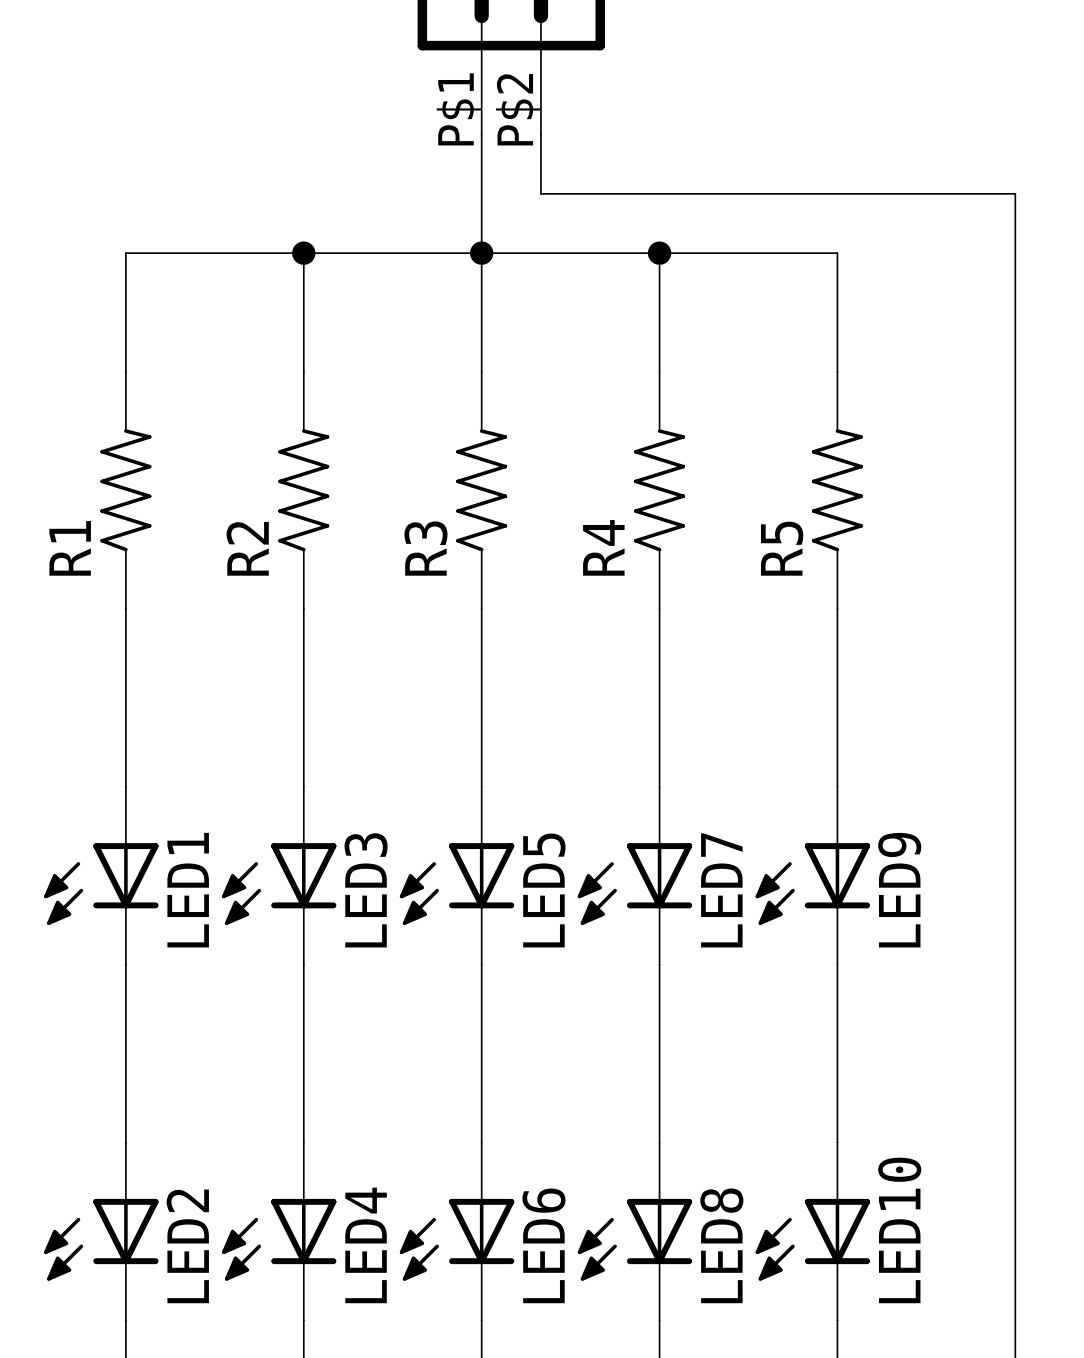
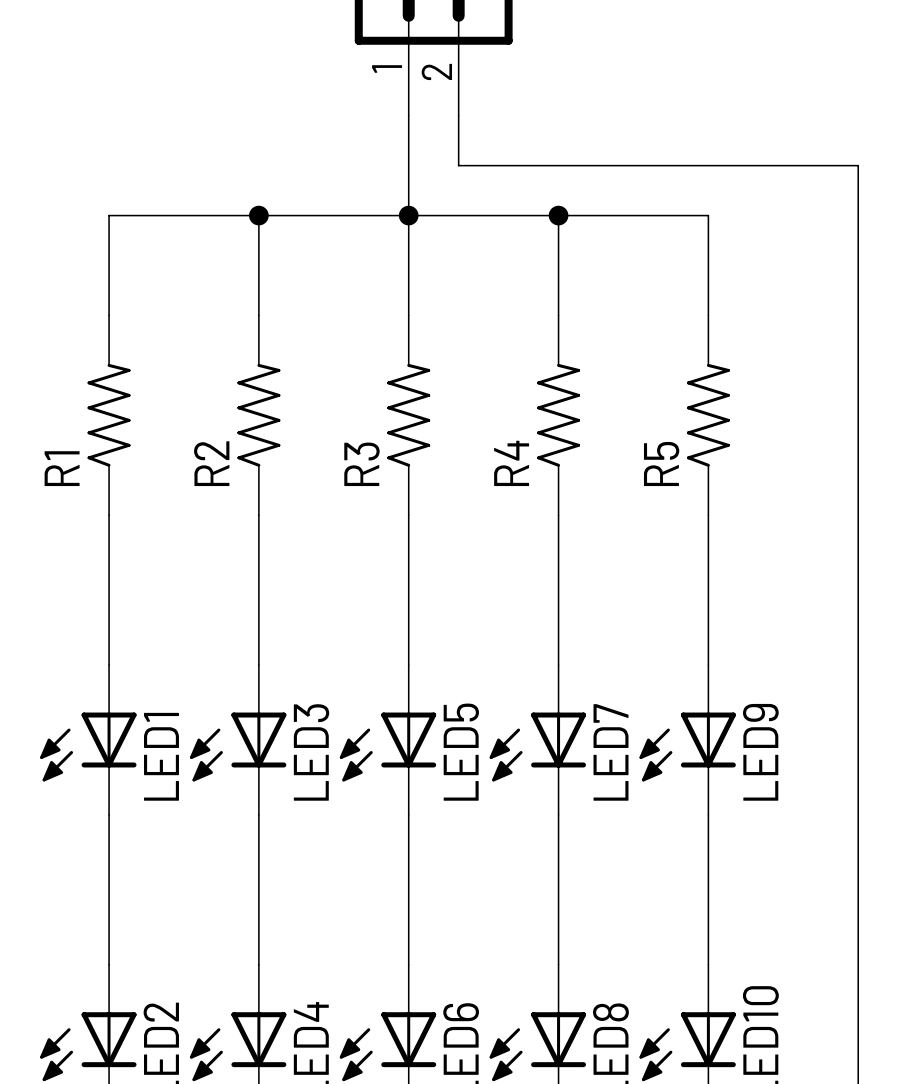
part pin number: P$1 (458, 109) -> 1 (387, 69)
part pin number: P$2 (518, 109) -> 2 (436, 71)

